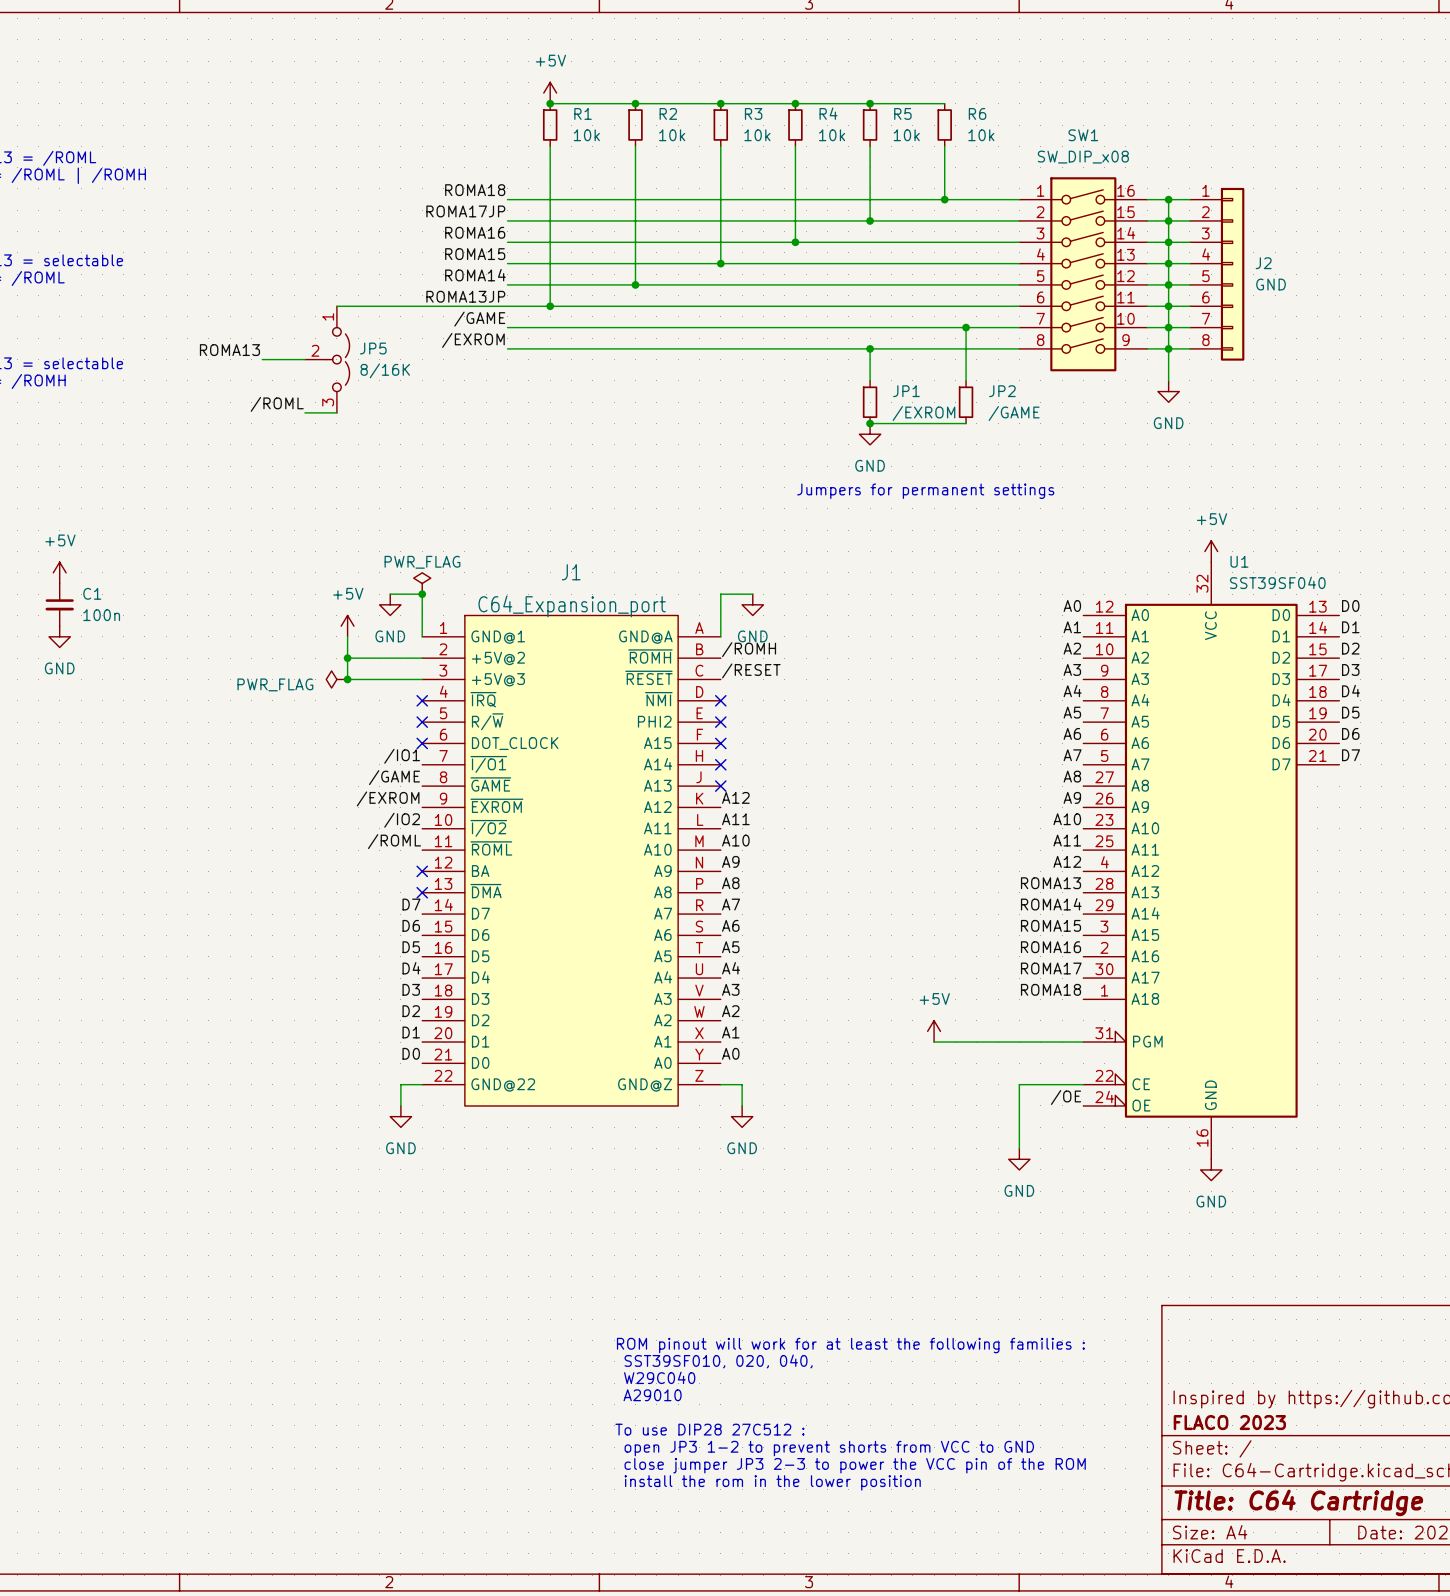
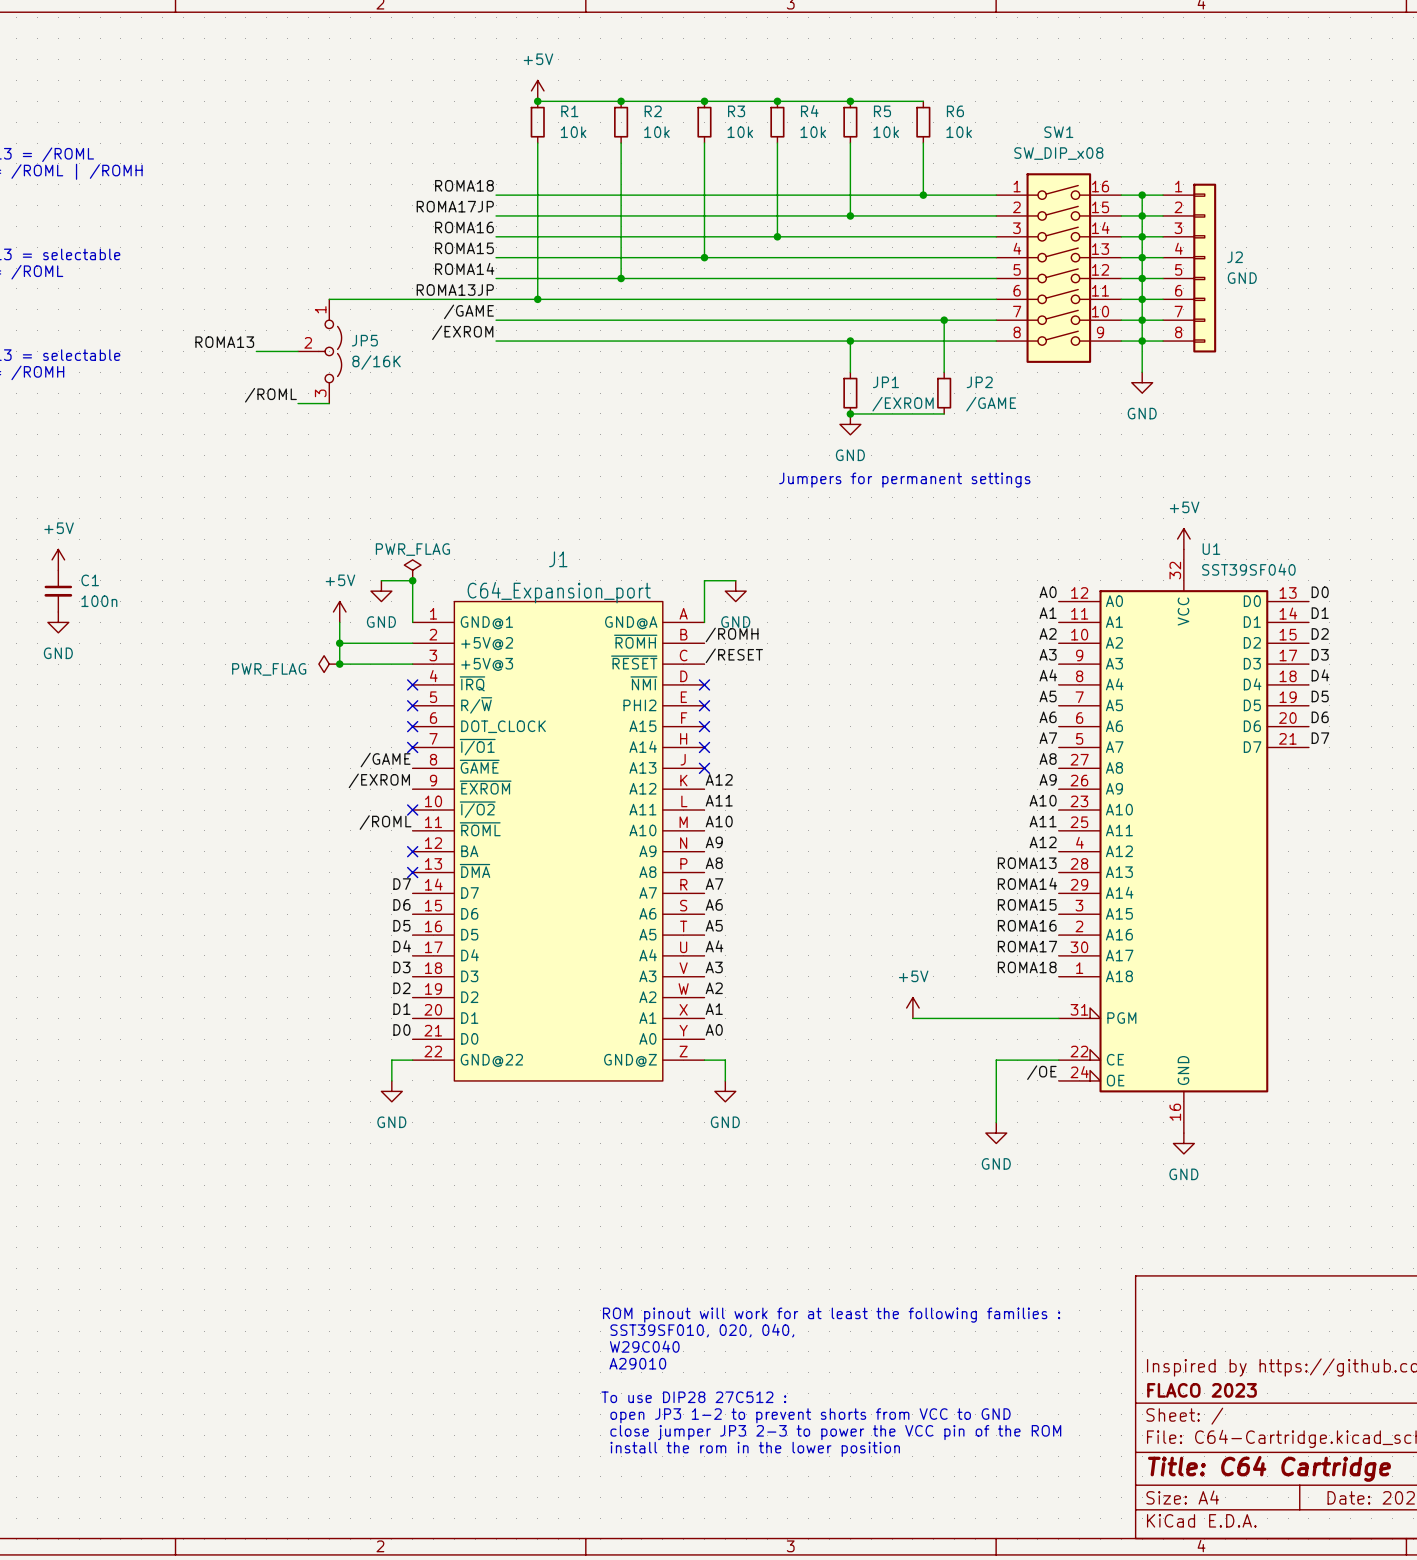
label: /IO1 (402, 756) -> none
no-connect mark: none -> (412, 747)
label: /IO2 (402, 820) -> none
no-connect mark: none -> (412, 810)

